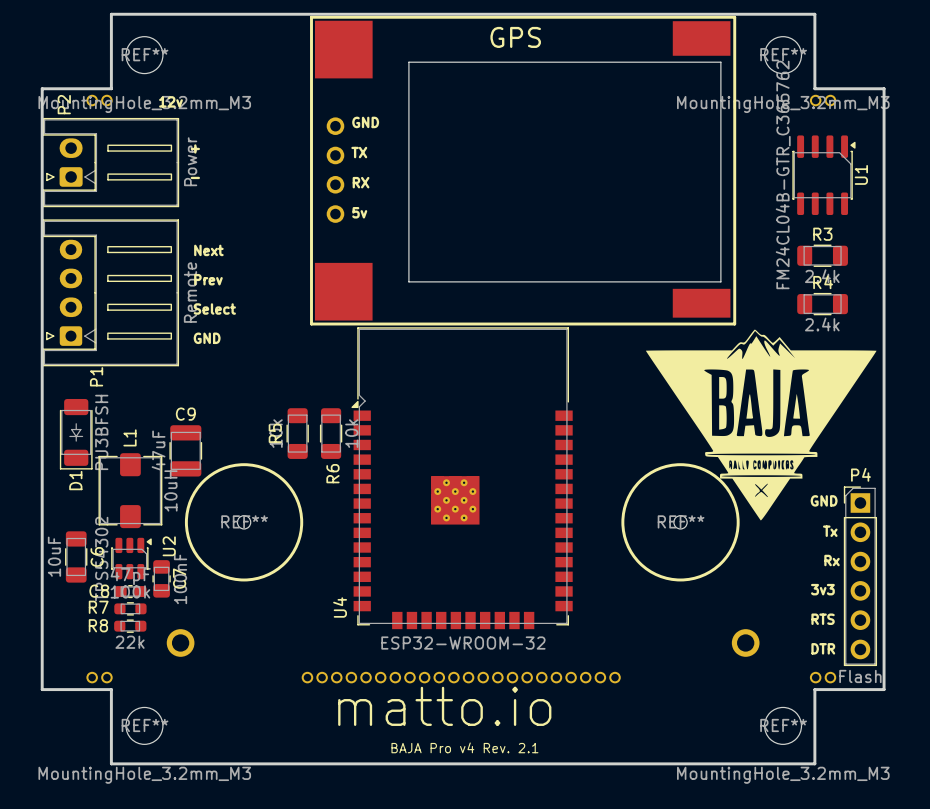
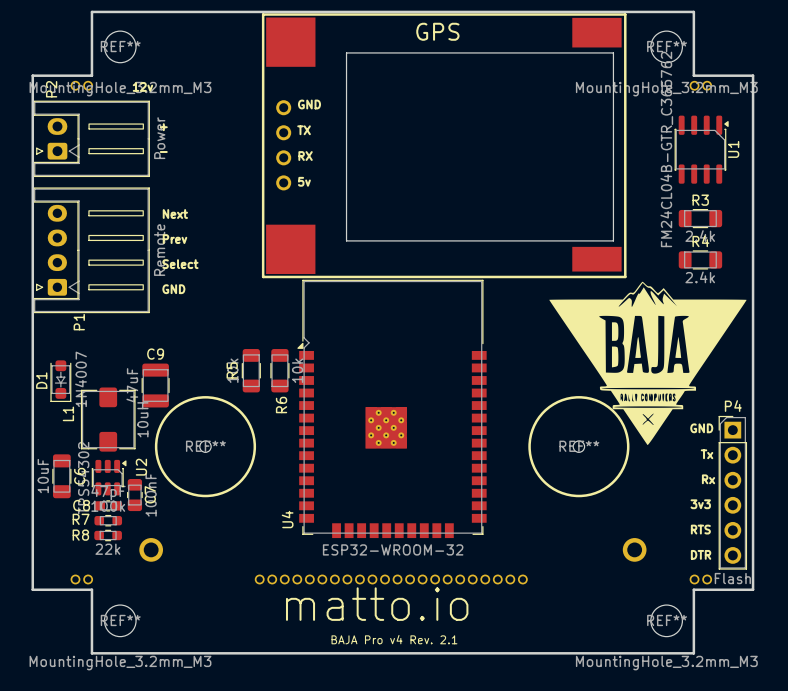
D1 footprint: [59, 398, 93, 470] -> [50, 360, 72, 402]
D1 value: PU3BFSH (101, 432) -> 1N4007 (81, 379)
L1 name position: L1 (130, 437) -> L1 (68, 413)
D1 name position: D1 (75, 480) -> D1 (41, 380)

